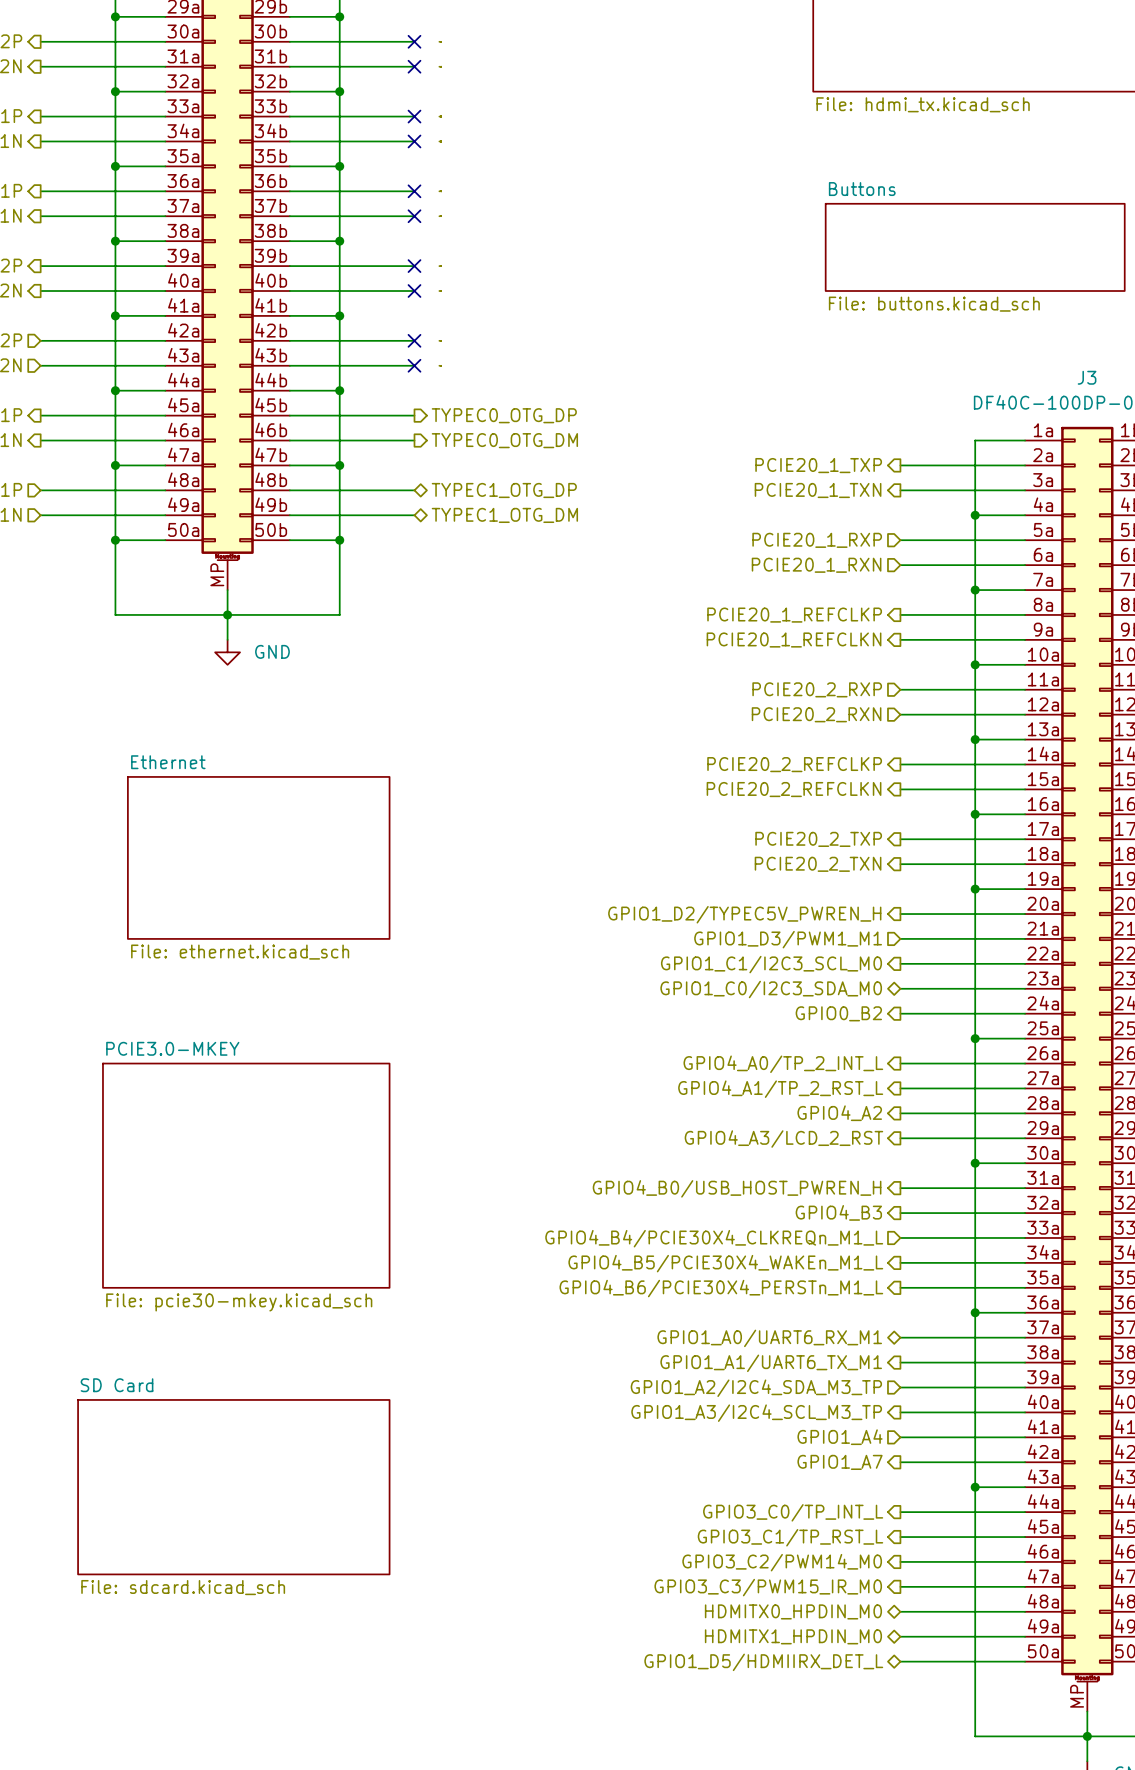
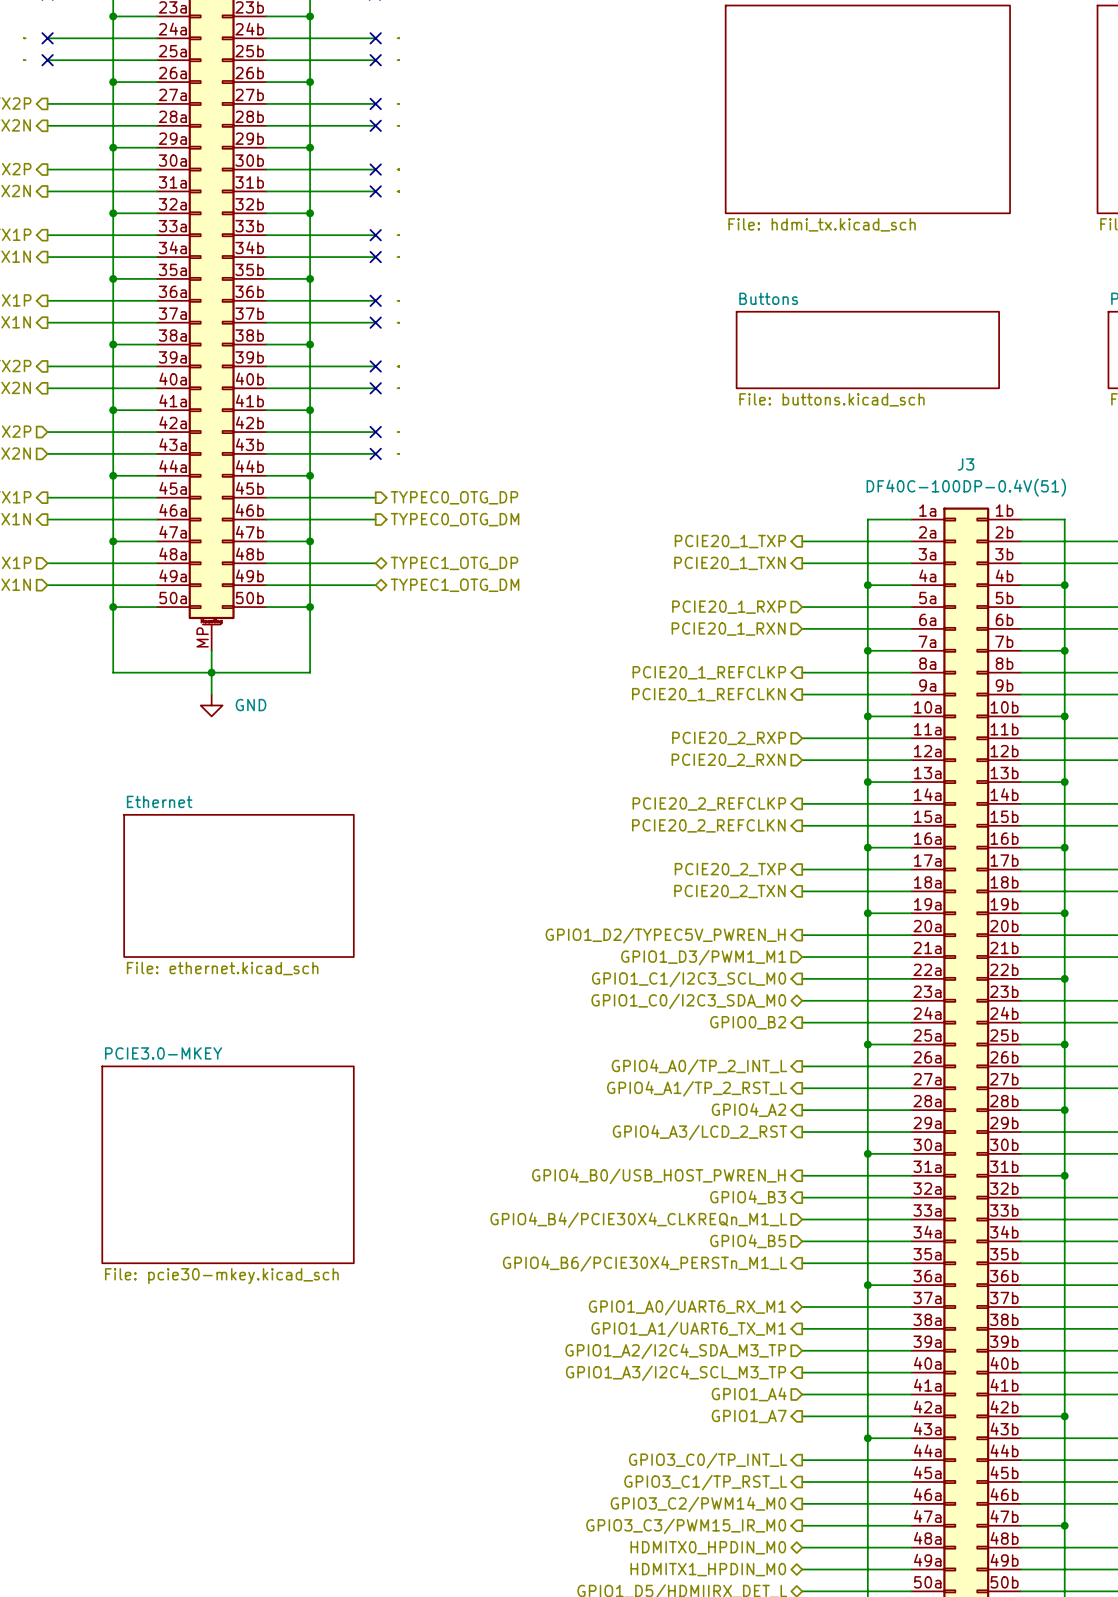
hierarchical label shape: output (725, 1263) -> input (748, 1241)
hierarchical label: GPIO4_B5/PCIE30X4_WAKEn_M1_L (725, 1263) -> GPIO4_B5 (748, 1241)
sheet SD Card: File: sdcard.kicad_sch (233, 1487) -> none

